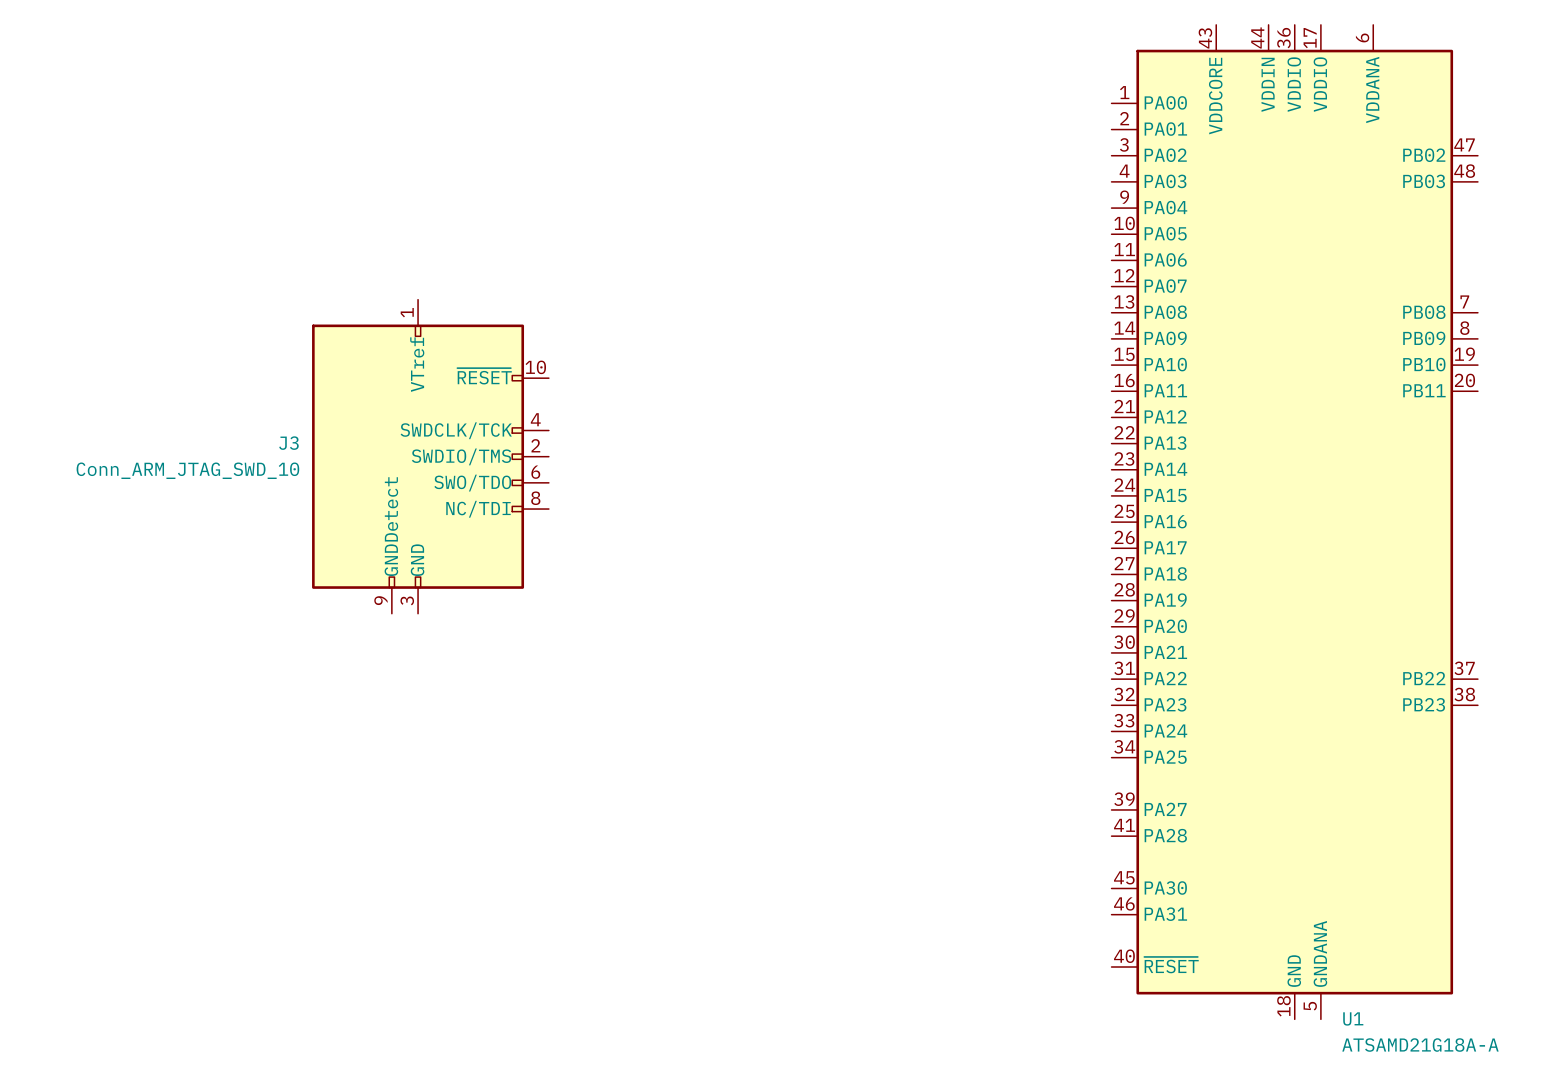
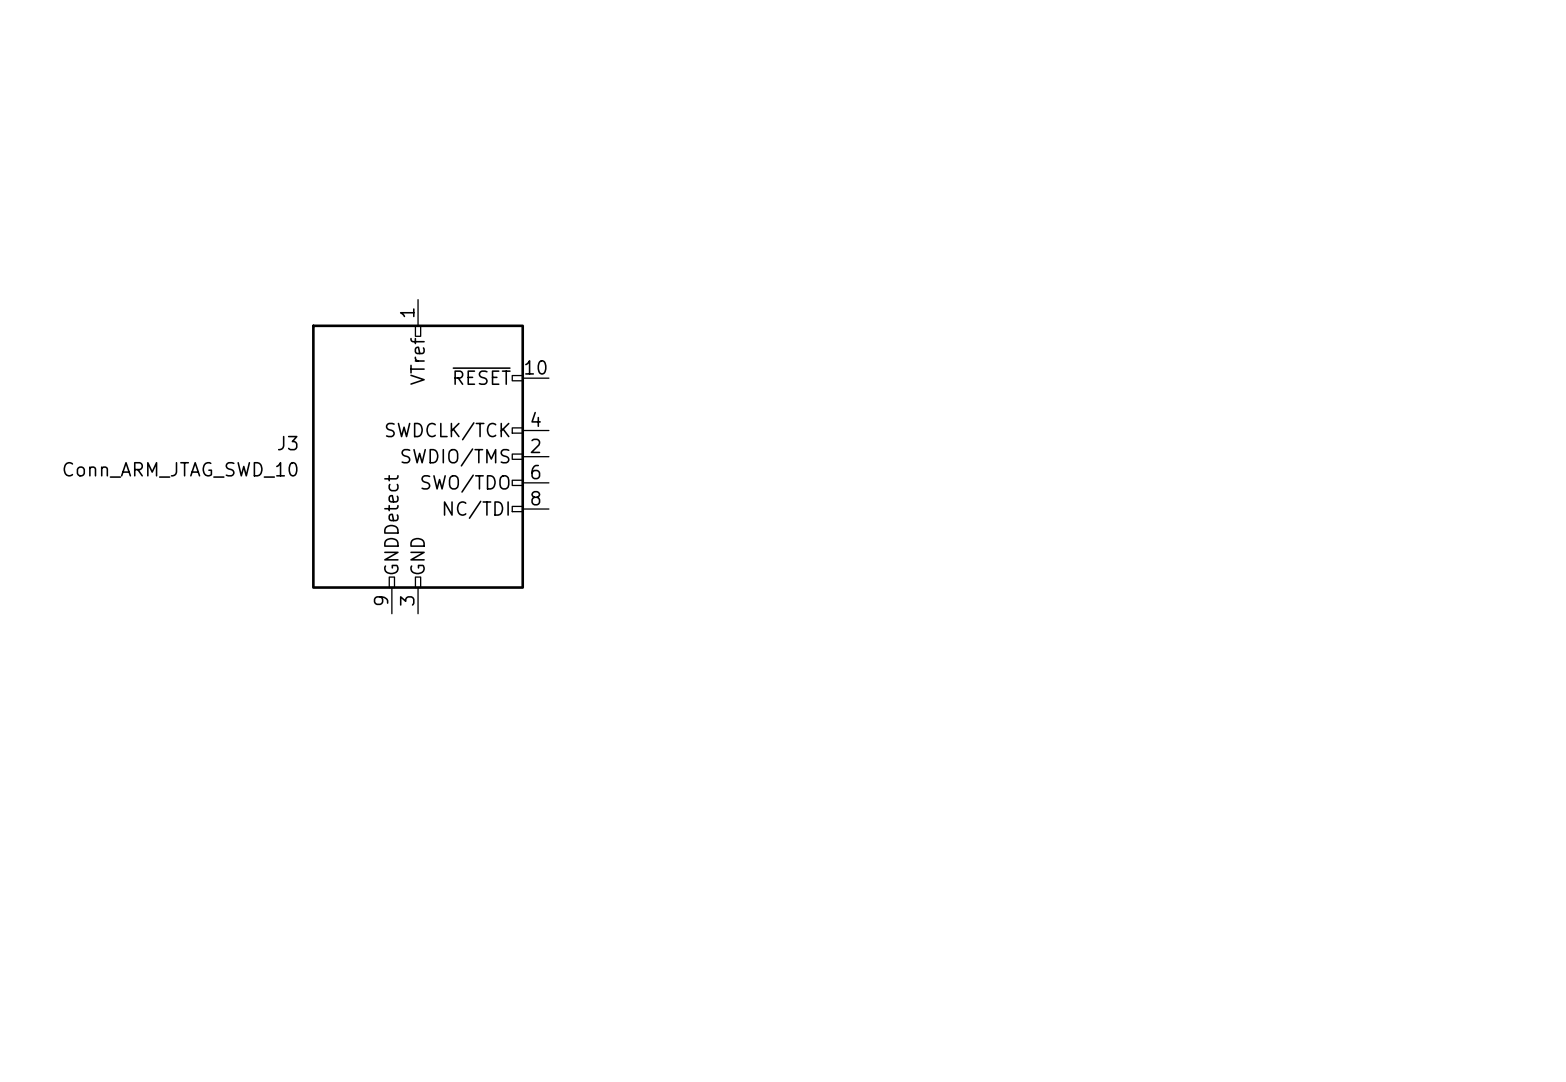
U1: ATSAMD21G18A-A (1294, 522) -> none

